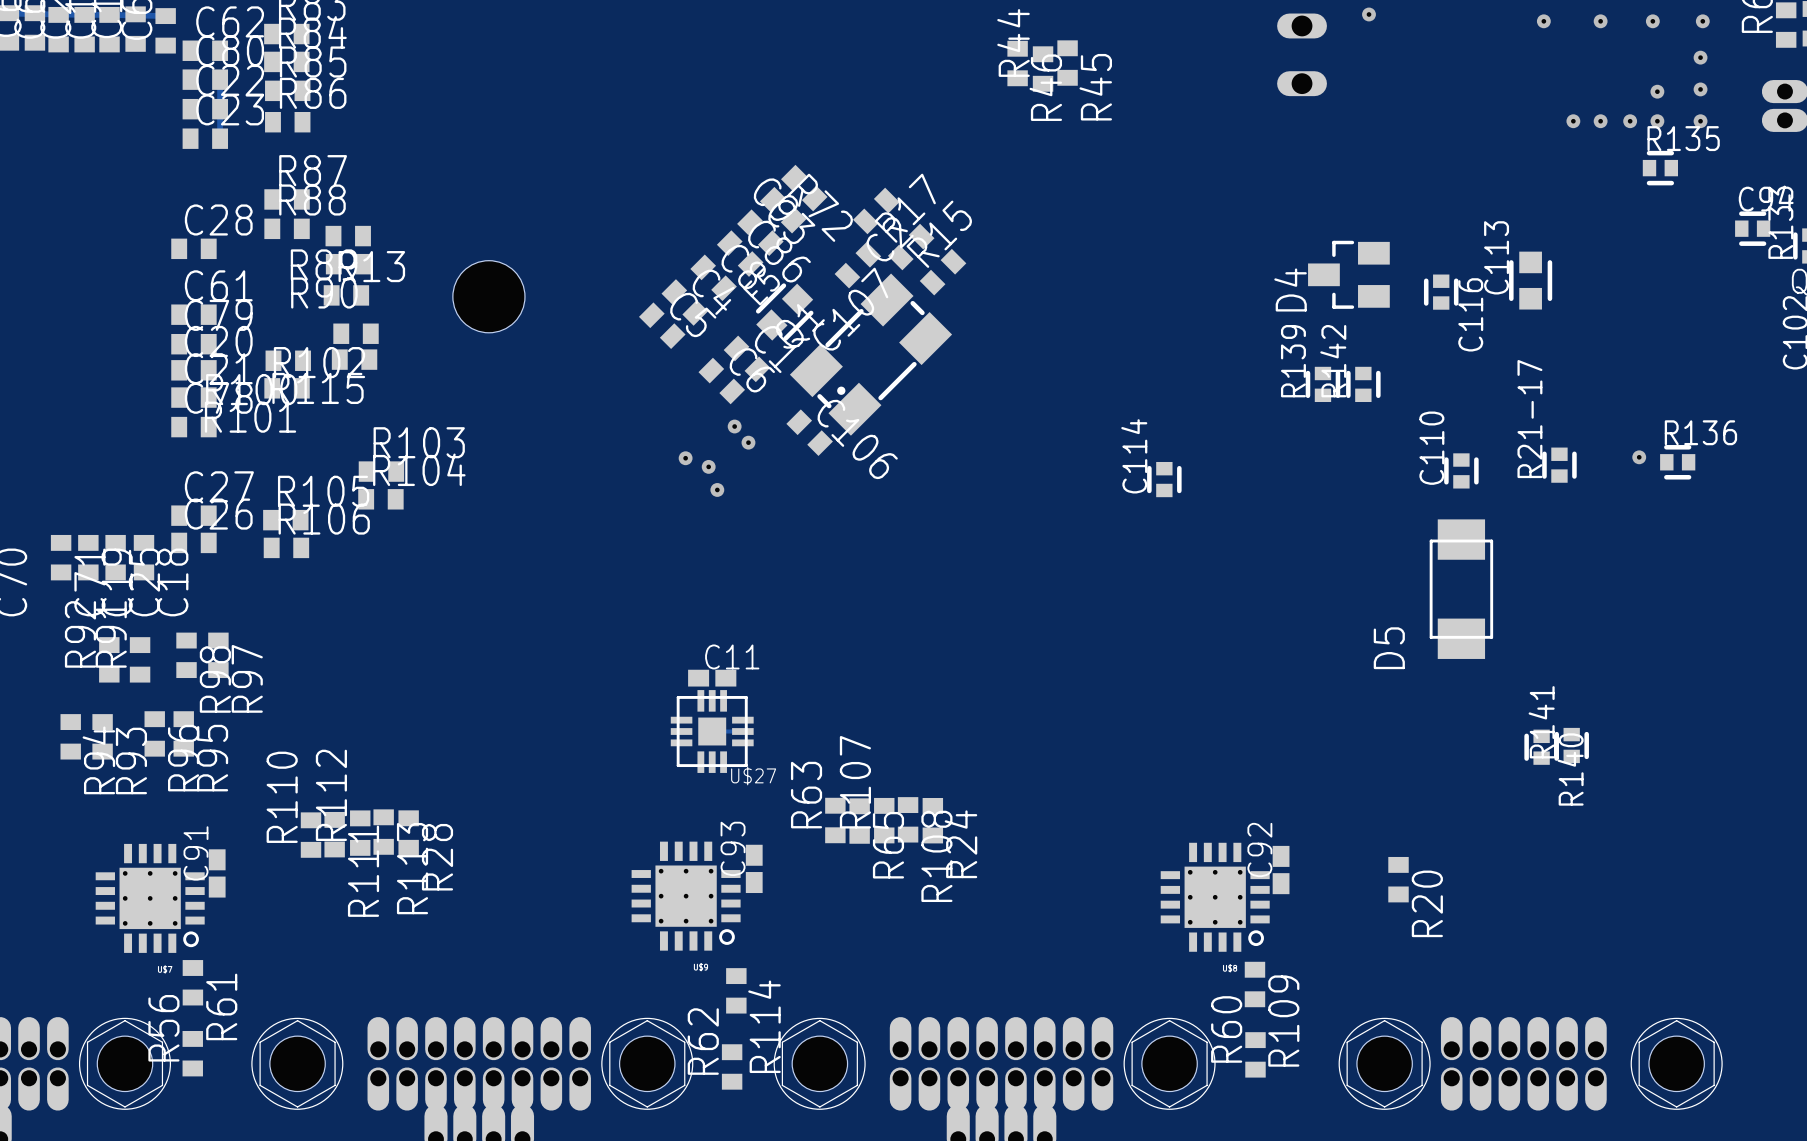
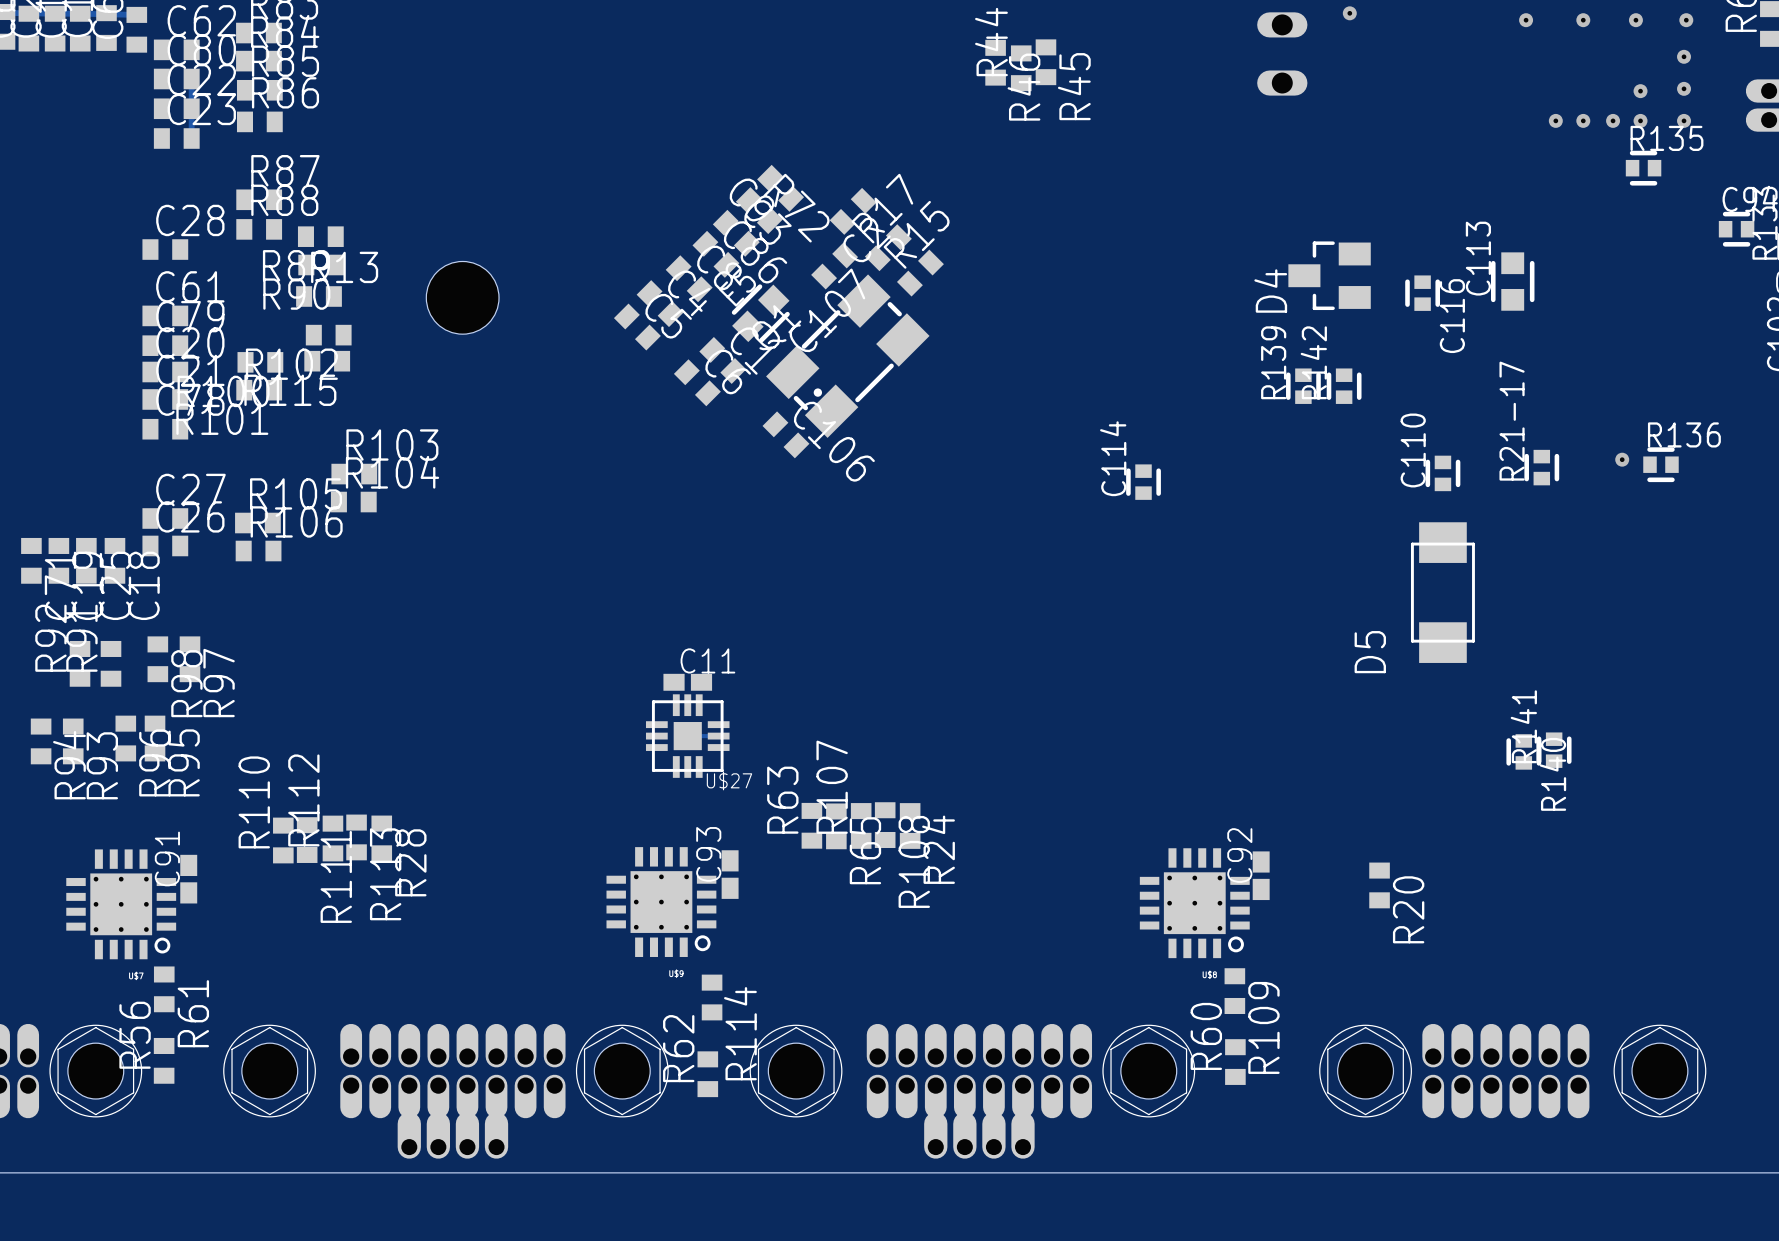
via: (734, 426) -> none
via: (748, 442) -> none
via: (685, 458) -> none
via: (708, 466) -> none
via: (717, 489) -> none

